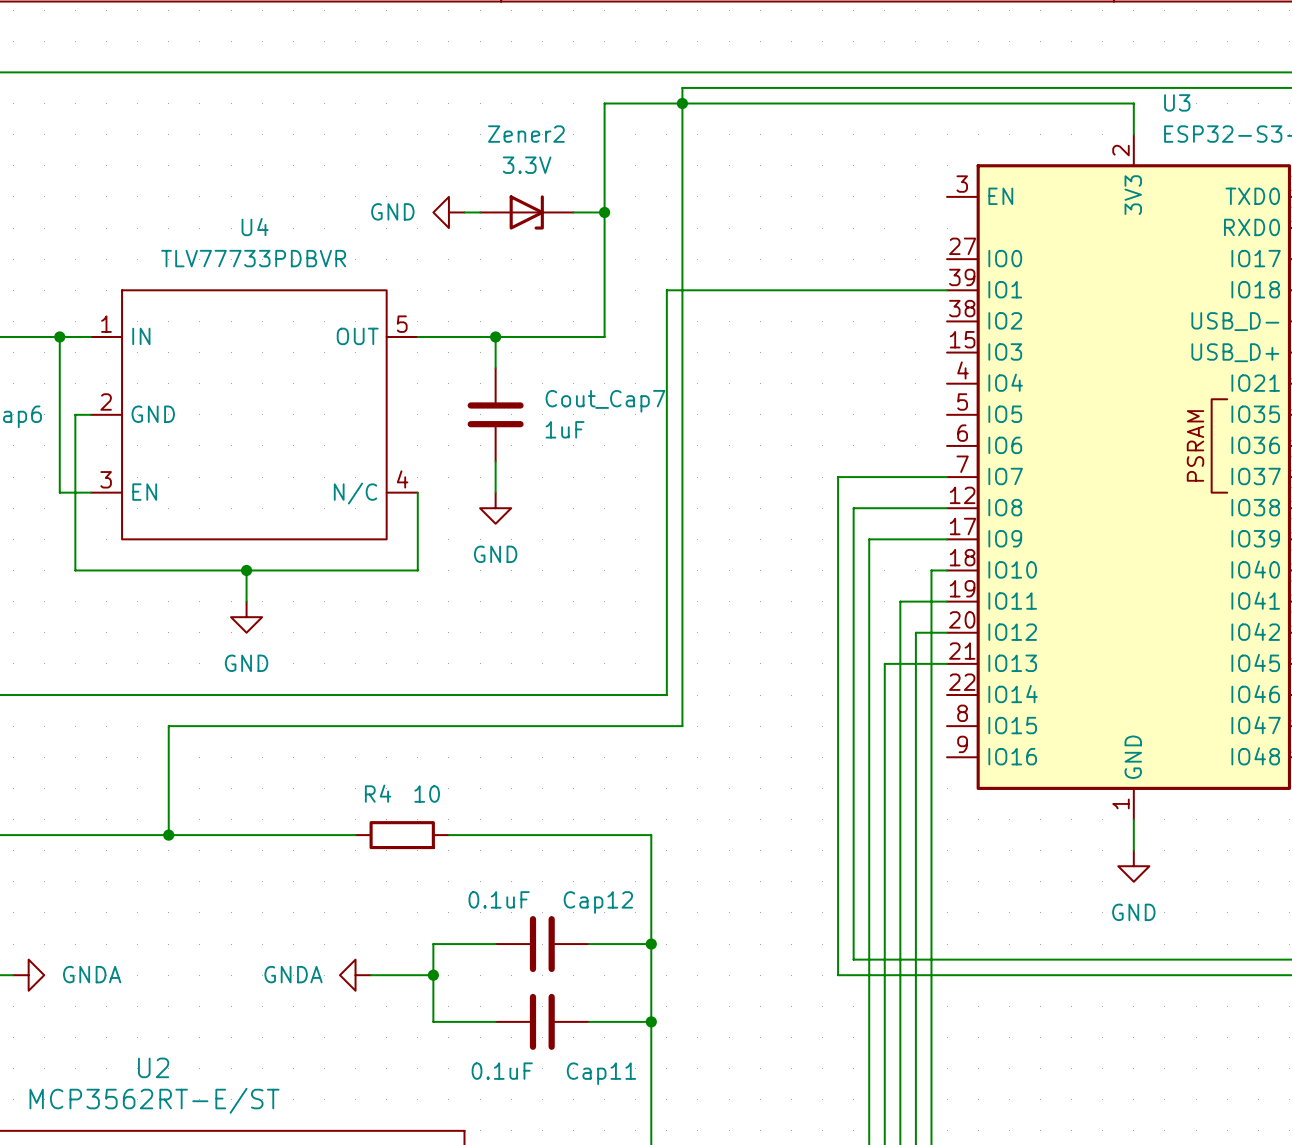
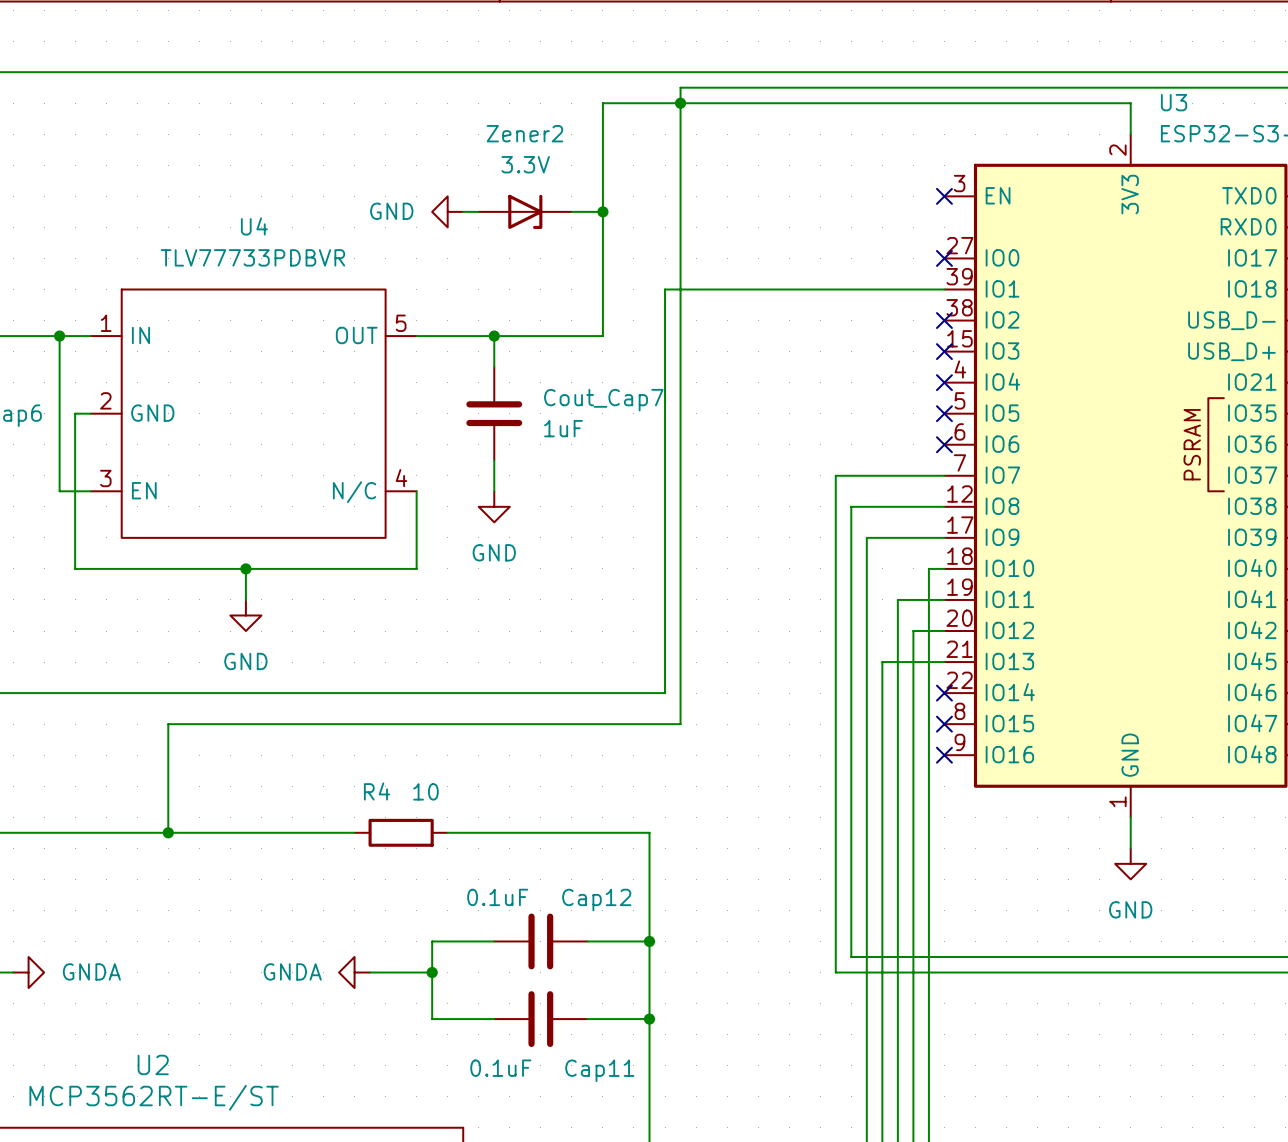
no-connect mark: none -> (944, 196)
no-connect mark: none -> (944, 258)
no-connect mark: none -> (944, 320)
no-connect mark: none -> (944, 351)
no-connect mark: none -> (944, 382)
no-connect mark: none -> (944, 413)
no-connect mark: none -> (944, 444)
no-connect mark: none -> (944, 693)
no-connect mark: none -> (944, 724)
no-connect mark: none -> (944, 755)

